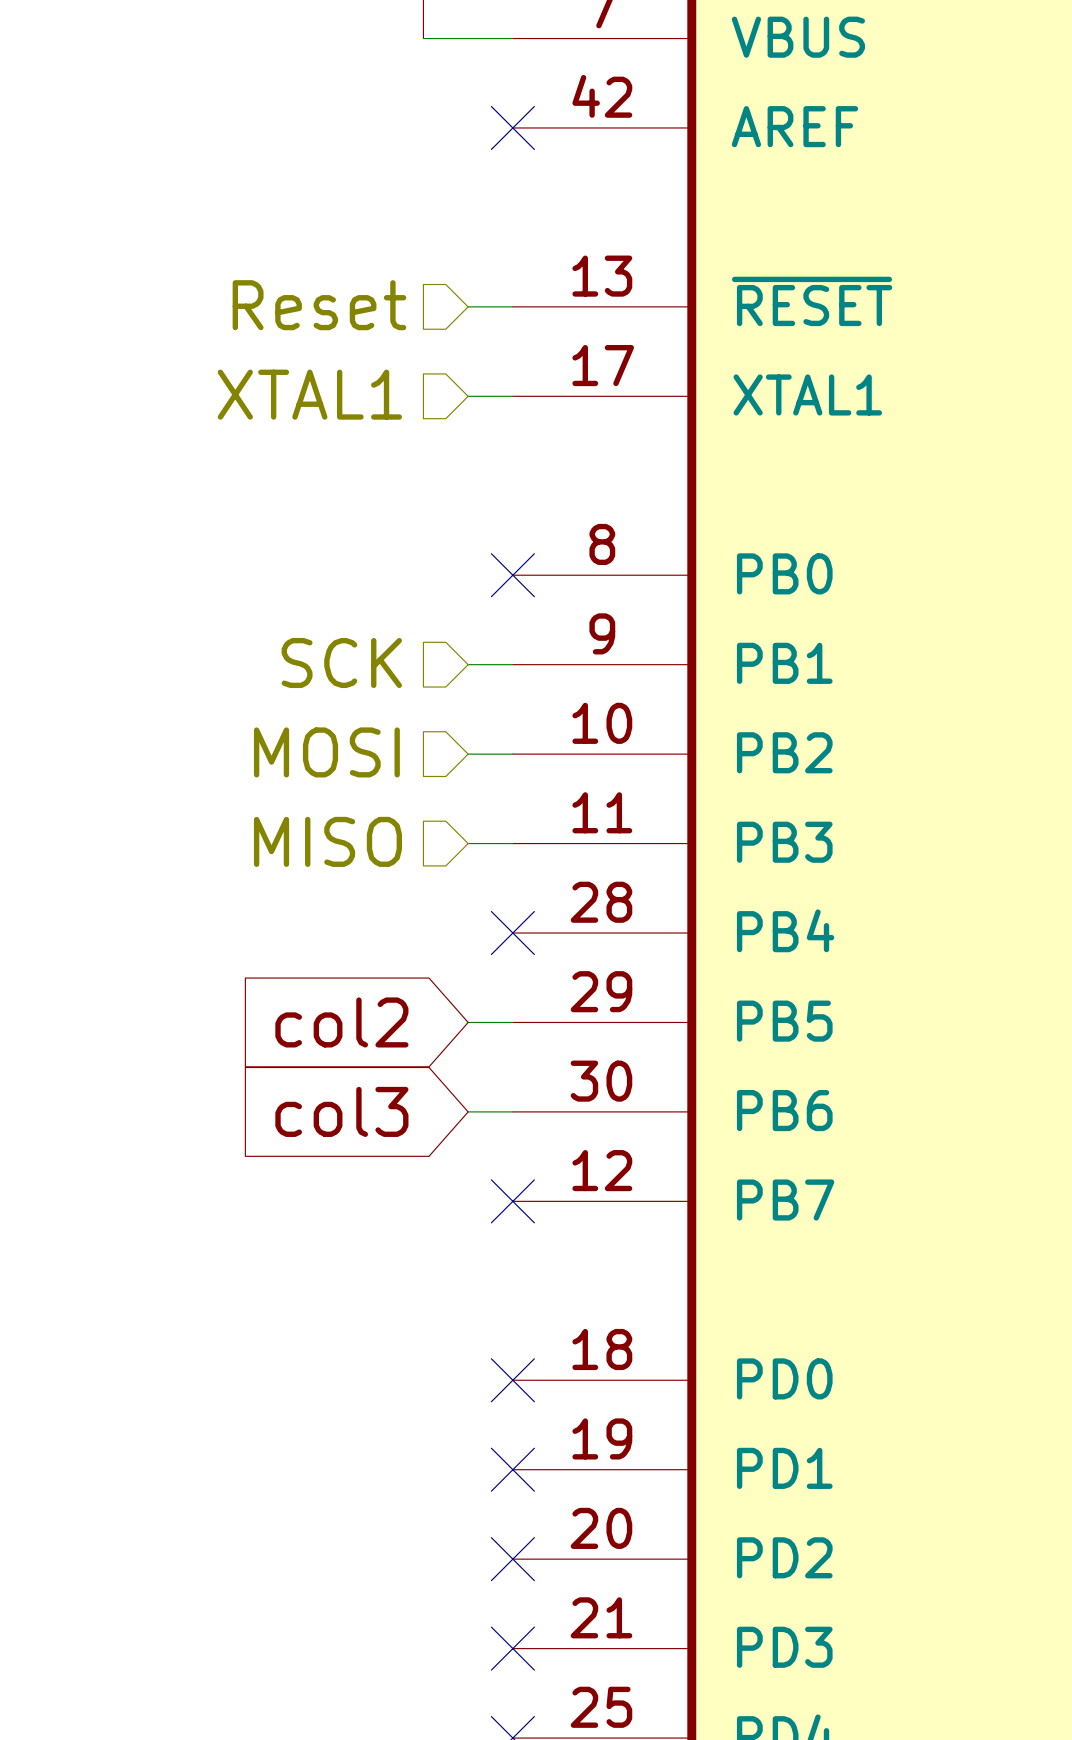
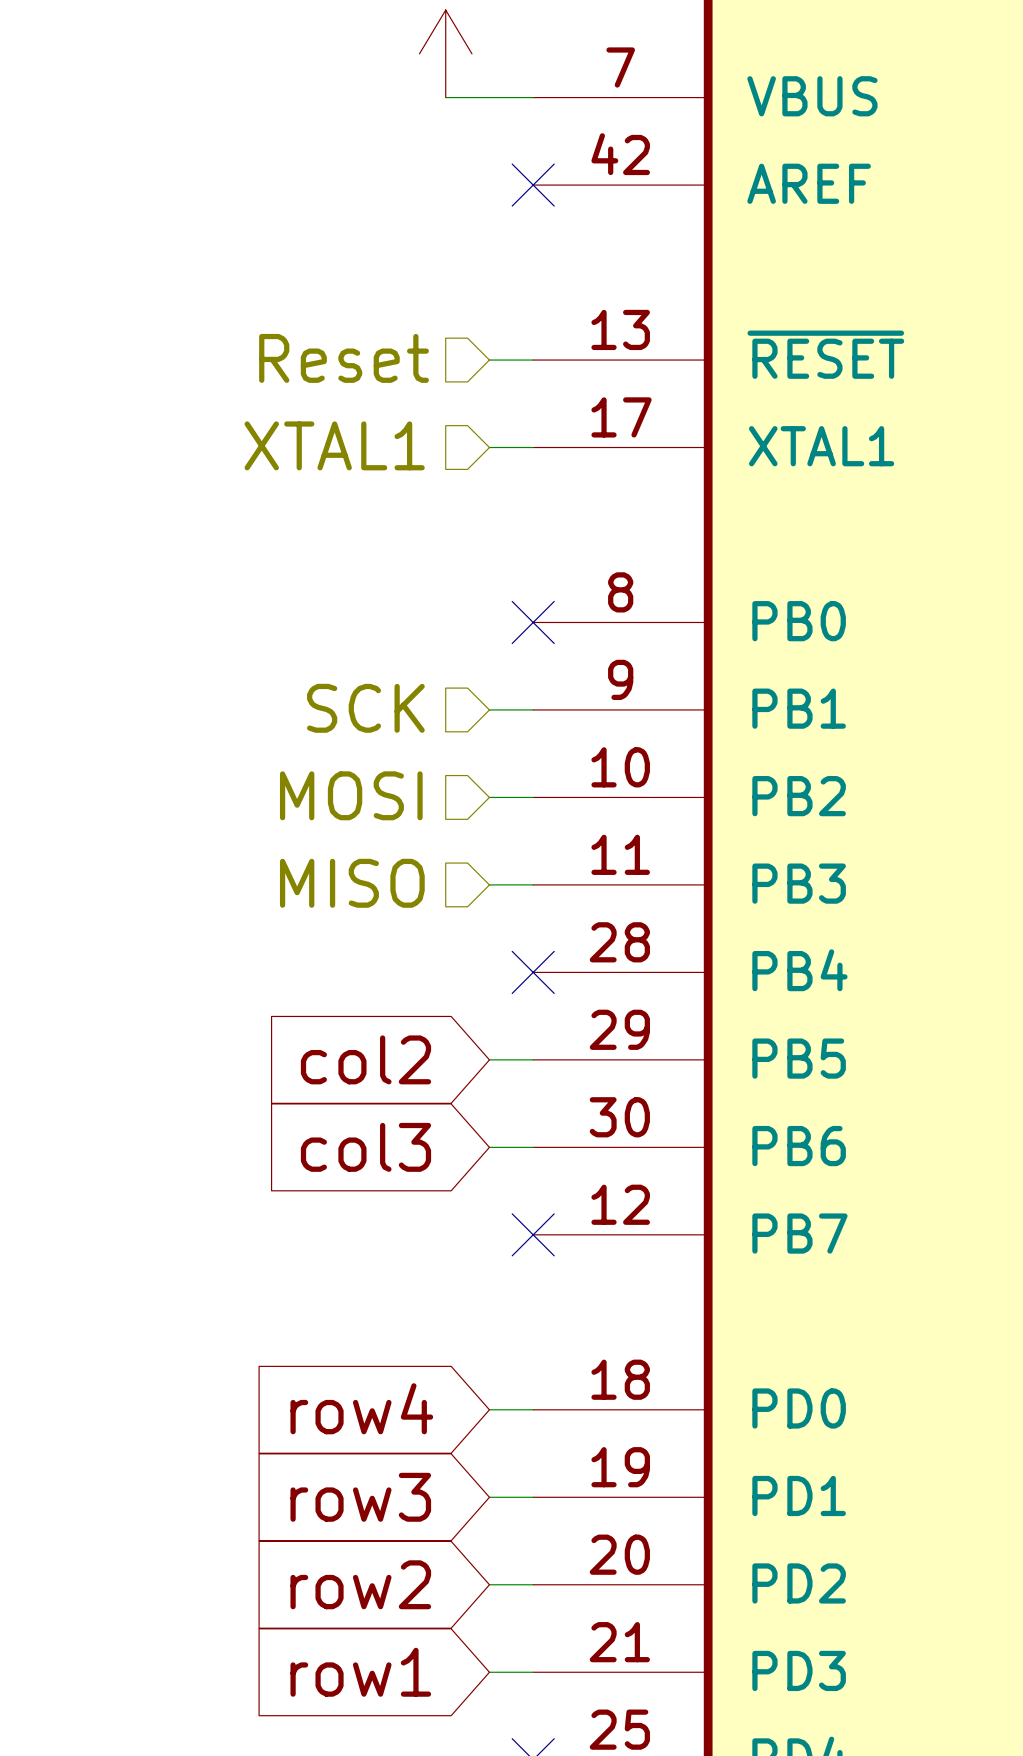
global label: none -> row4 (361, 1408)
wire: none -> (489, 1409) (533, 1409)
no-connect mark: (512, 1380) -> none
global label: none -> row3 (360, 1497)
wire: none -> (489, 1497) (533, 1497)
no-connect mark: (512, 1469) -> none
global label: none -> row2 (360, 1584)
wire: none -> (489, 1584) (533, 1584)
no-connect mark: (512, 1559) -> none
global label: none -> row1 (360, 1672)
wire: none -> (489, 1672) (533, 1672)
no-connect mark: (512, 1648) -> none

